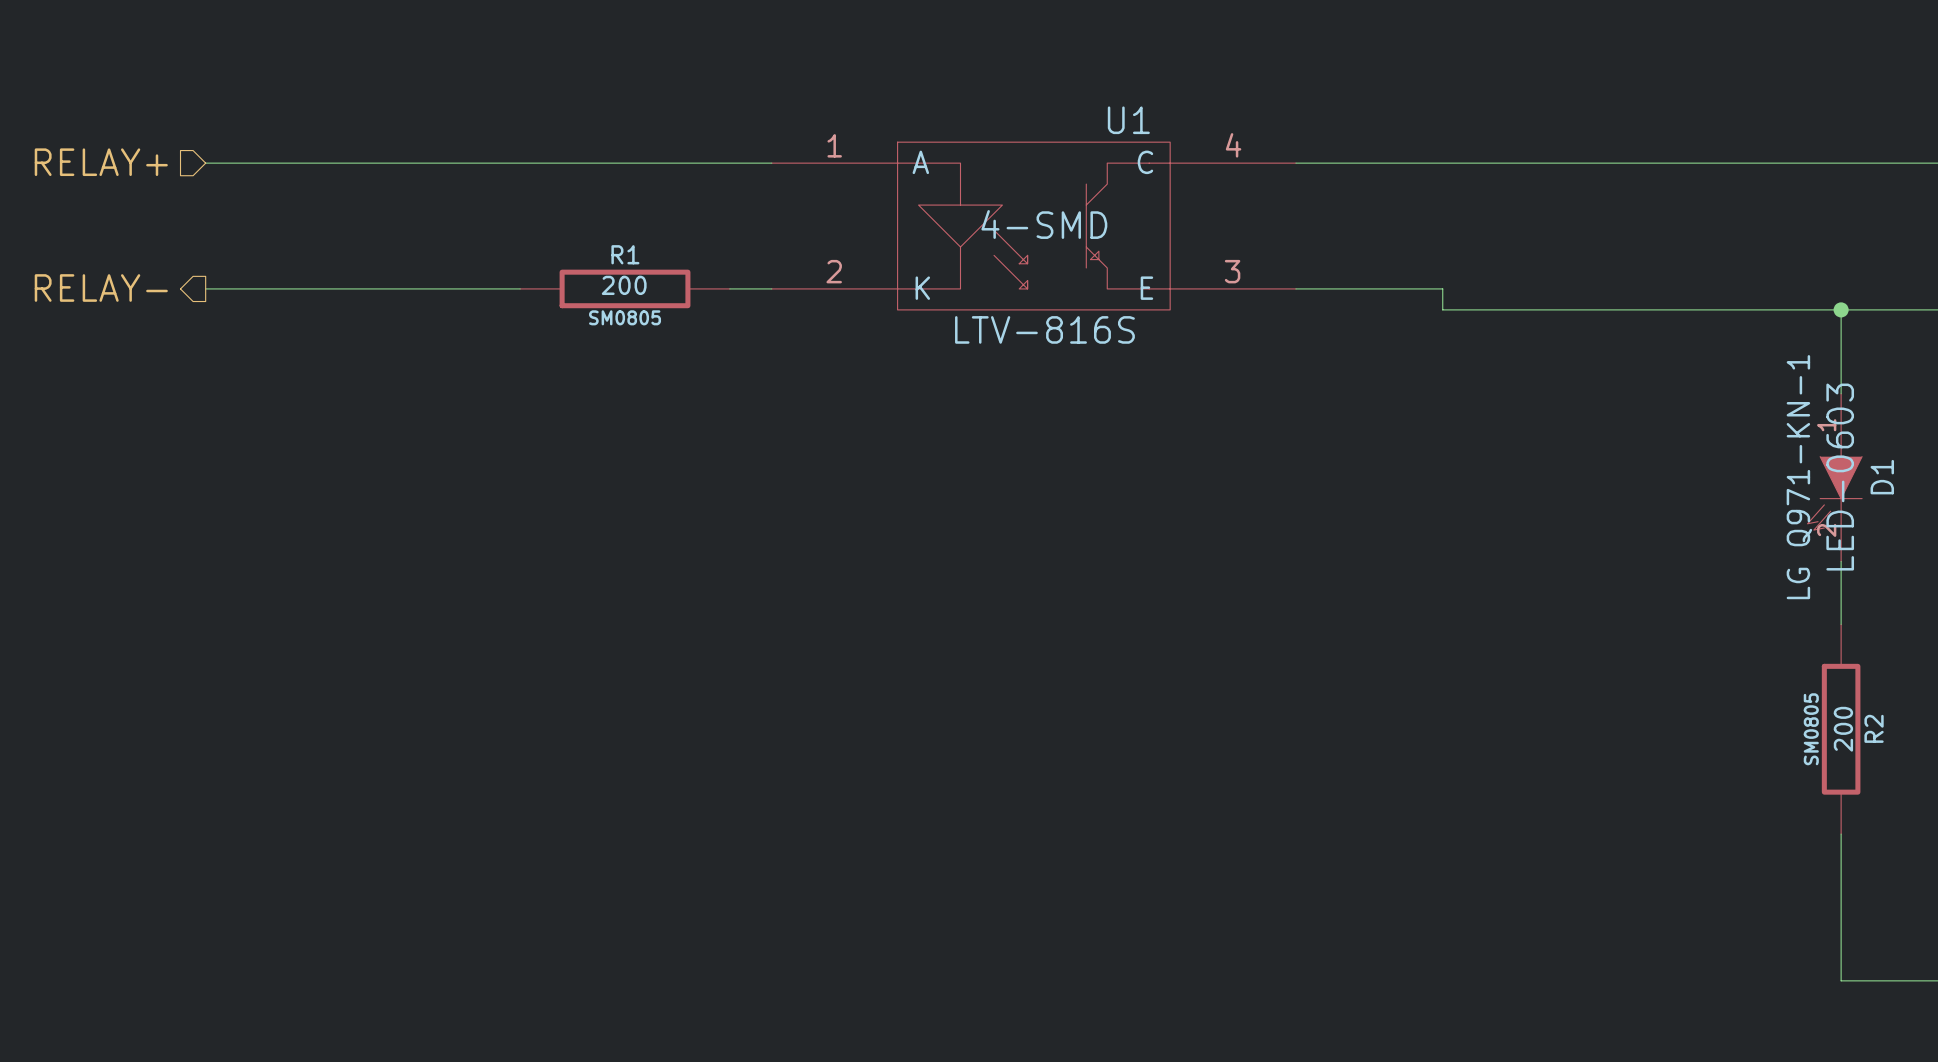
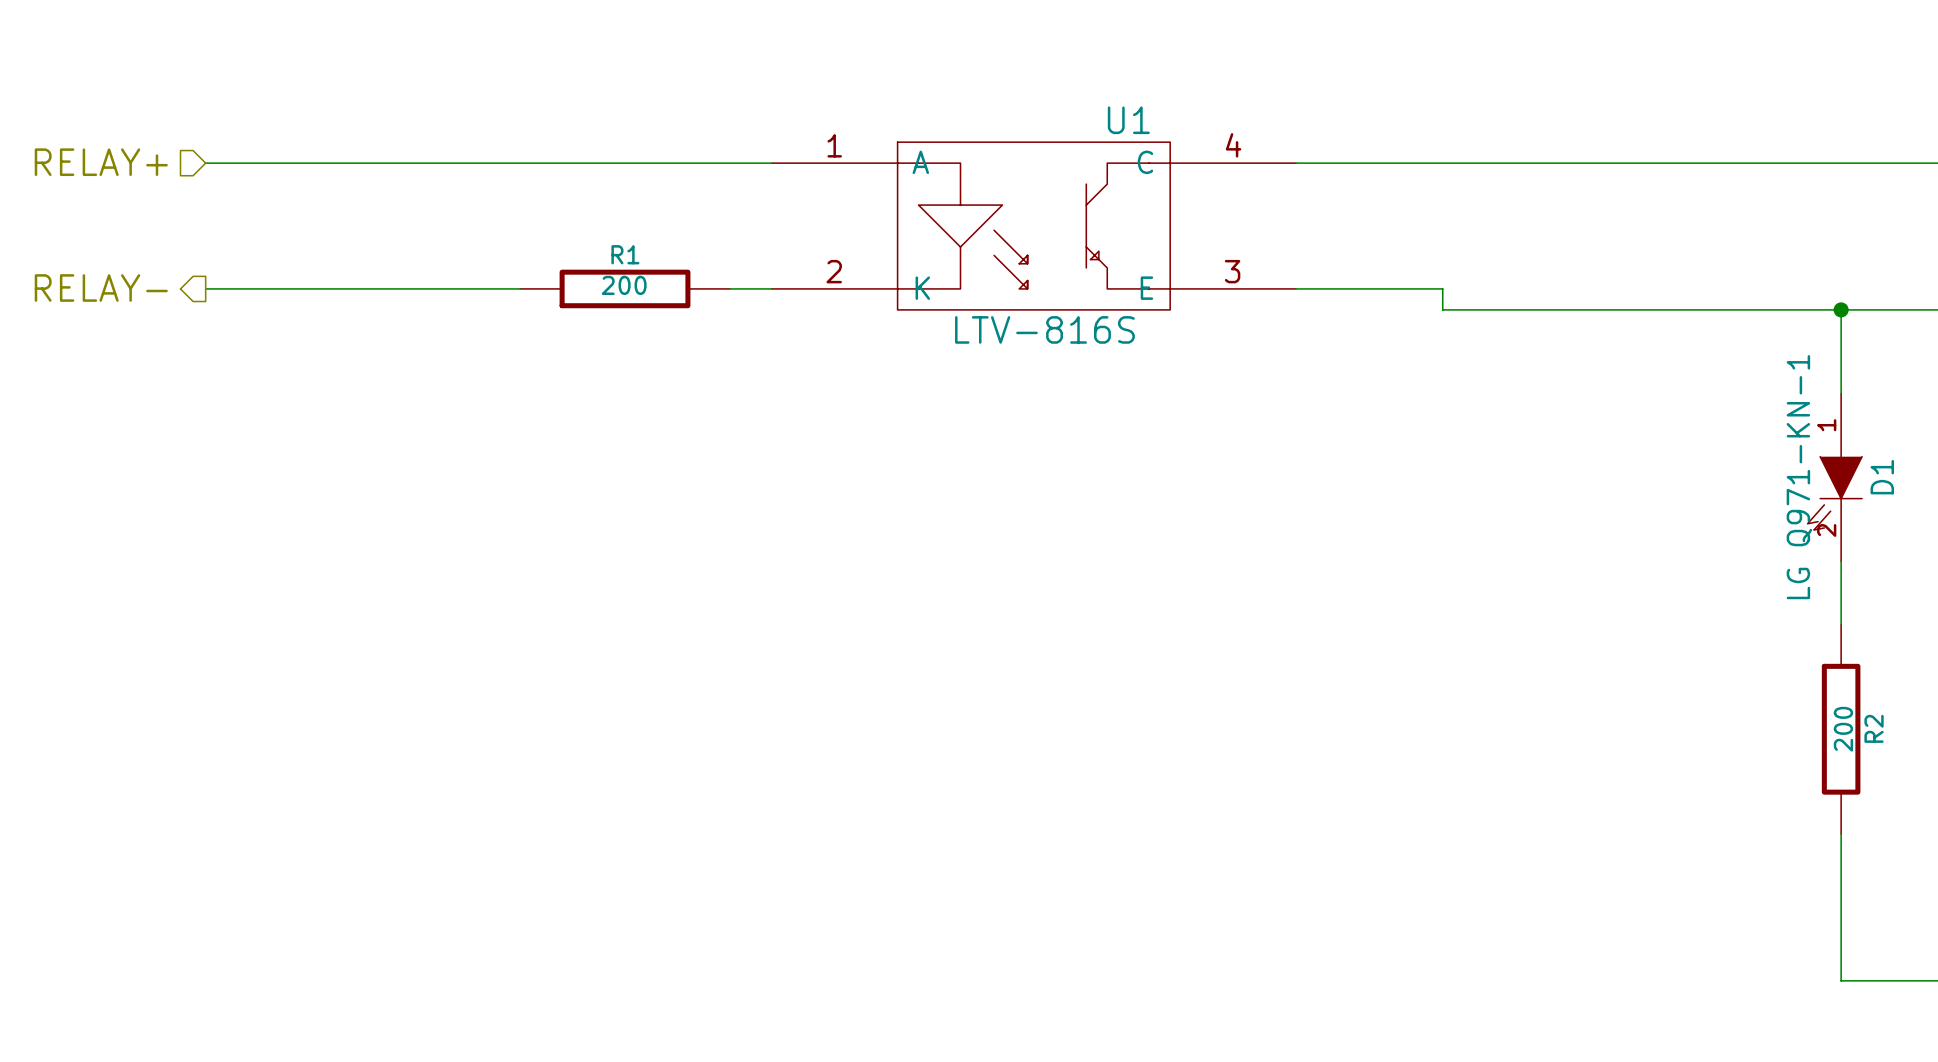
U1 text: 4-SMD (1044, 224) -> none
R1 text: SM0805 (625, 317) -> none
D1 text: LED-0603 (1840, 477) -> none
R2 text: SM0805 (1811, 729) -> none

